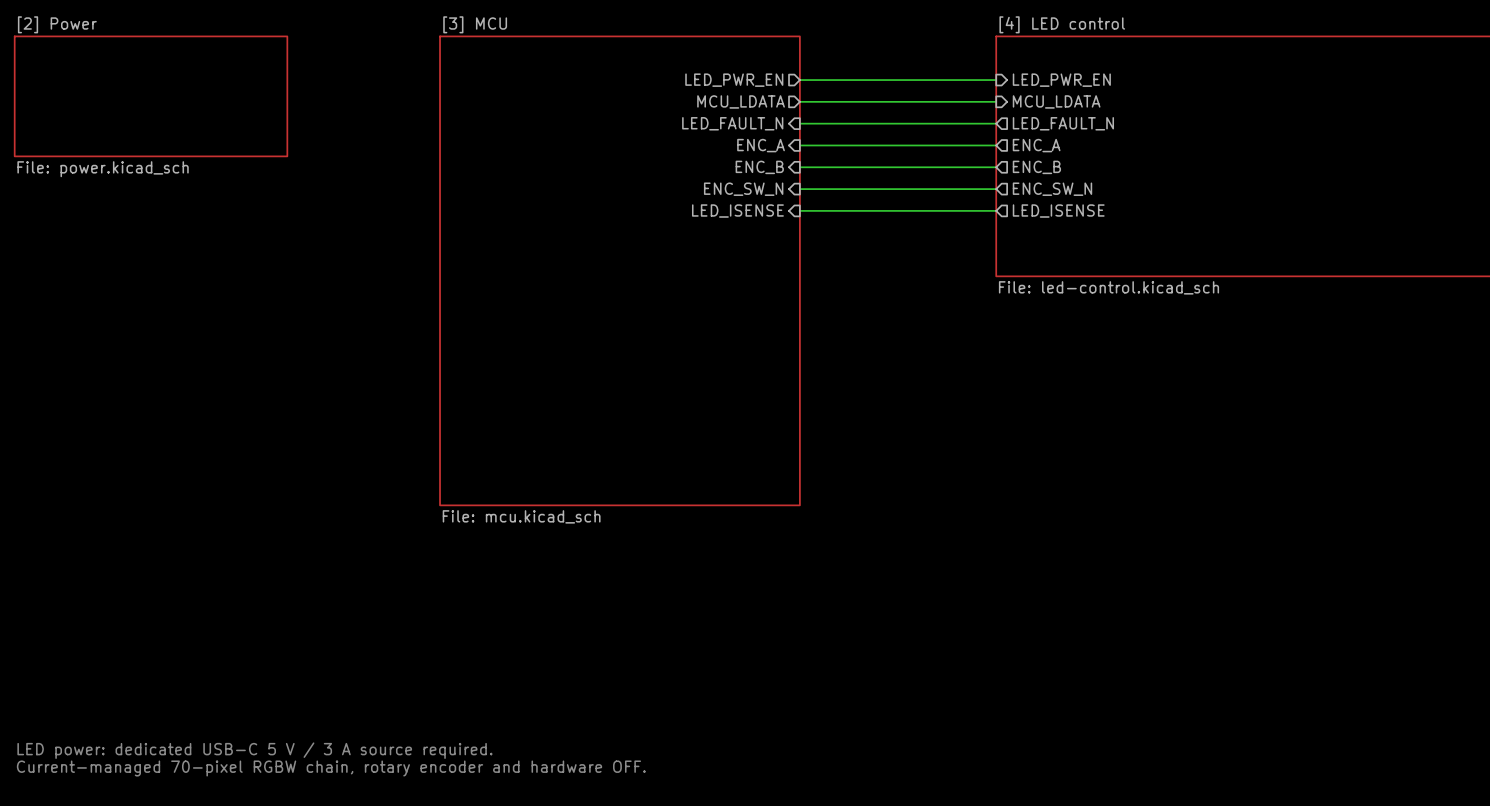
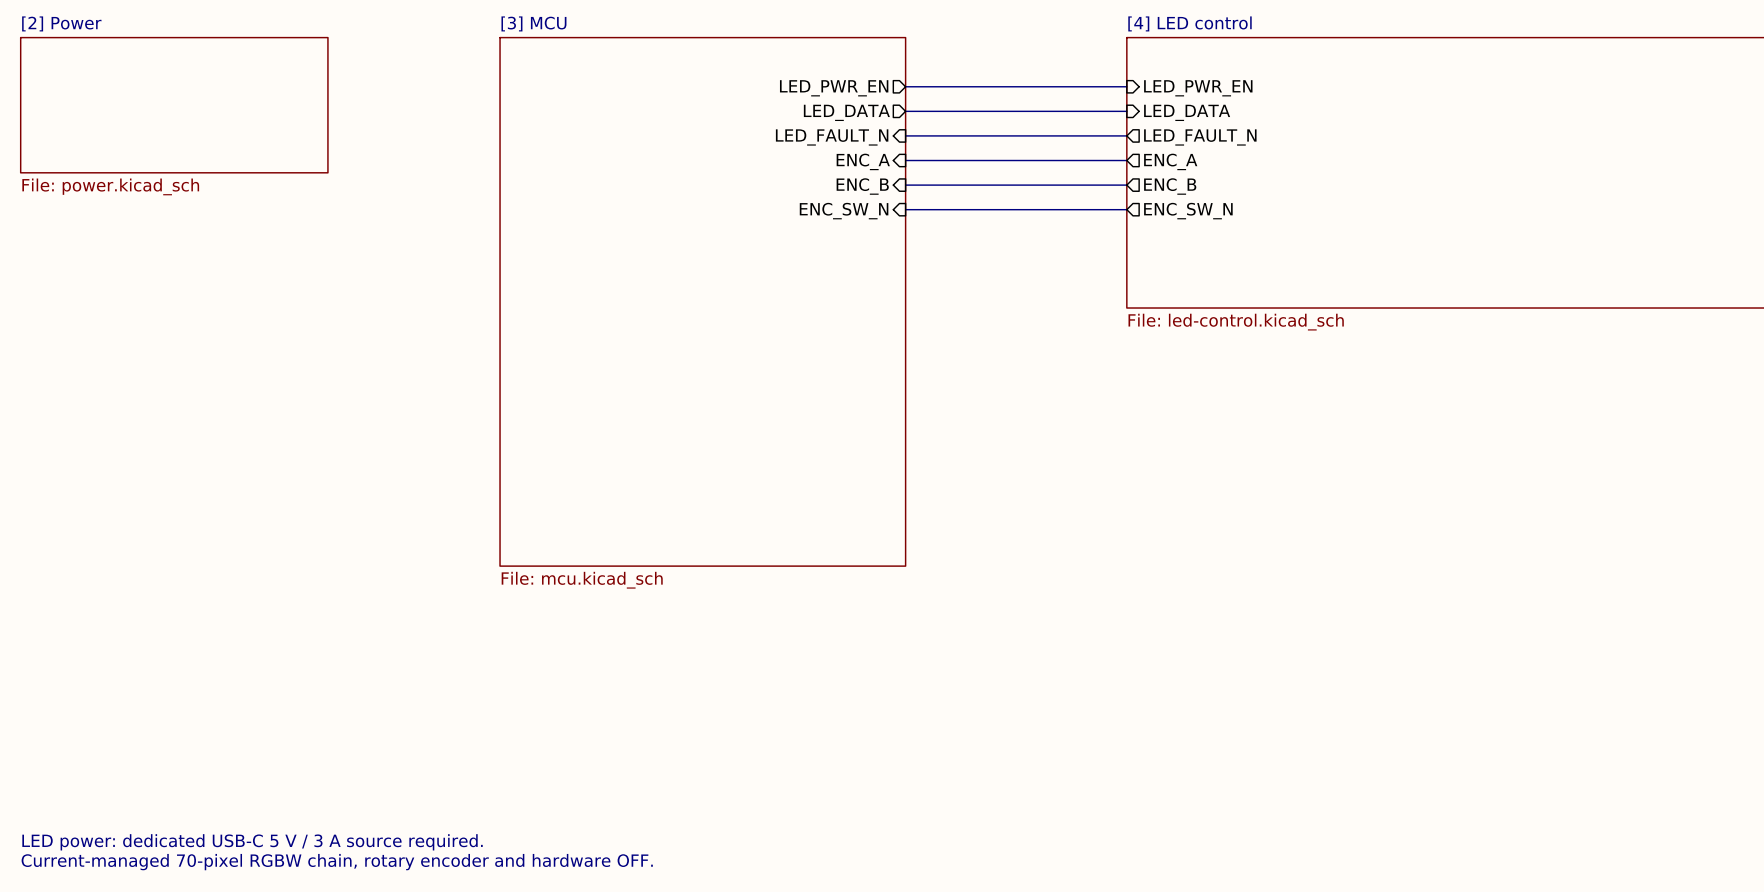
sheet pin: MCU_LDATA (741, 101) -> LED_DATA (846, 112)
sheet pin: MCU_LDATA (1056, 101) -> LED_DATA (1187, 112)
wire: (799, 210) (996, 210) -> none
sheet pin: LED_ISENSE (737, 211) -> none
sheet pin: LED_ISENSE (1058, 211) -> none

